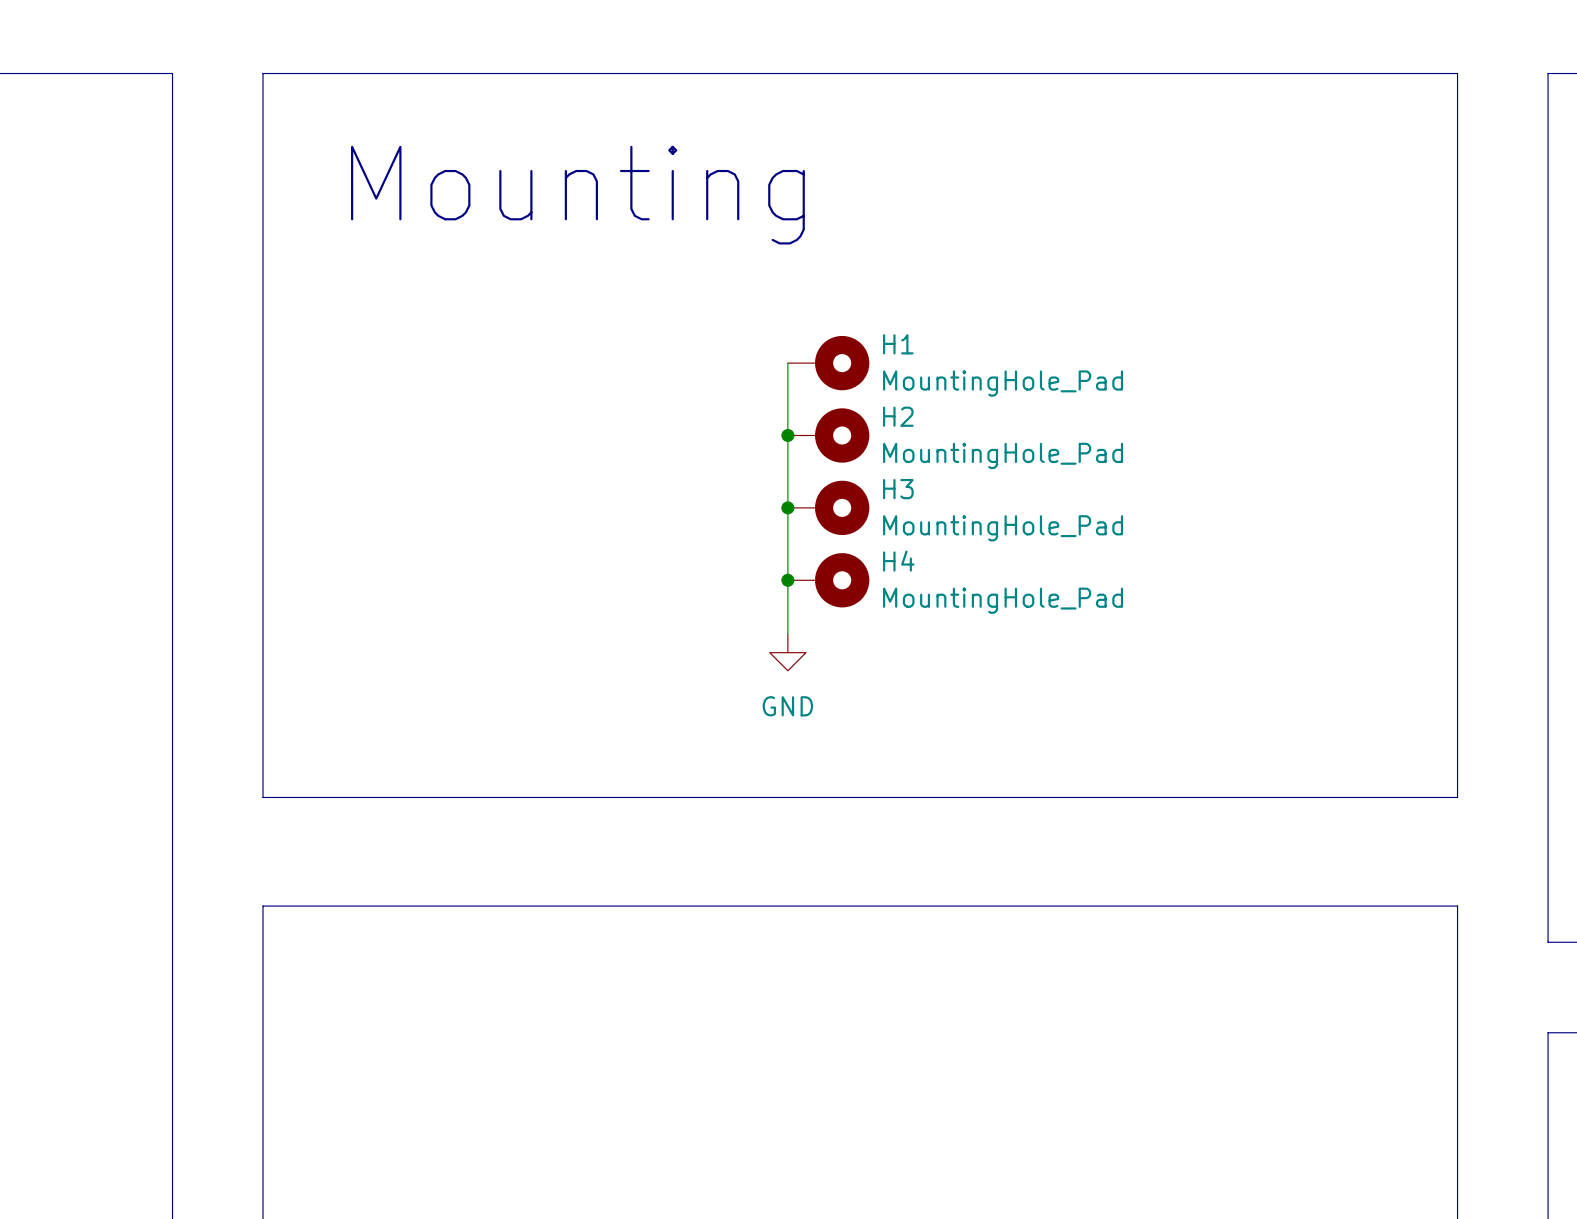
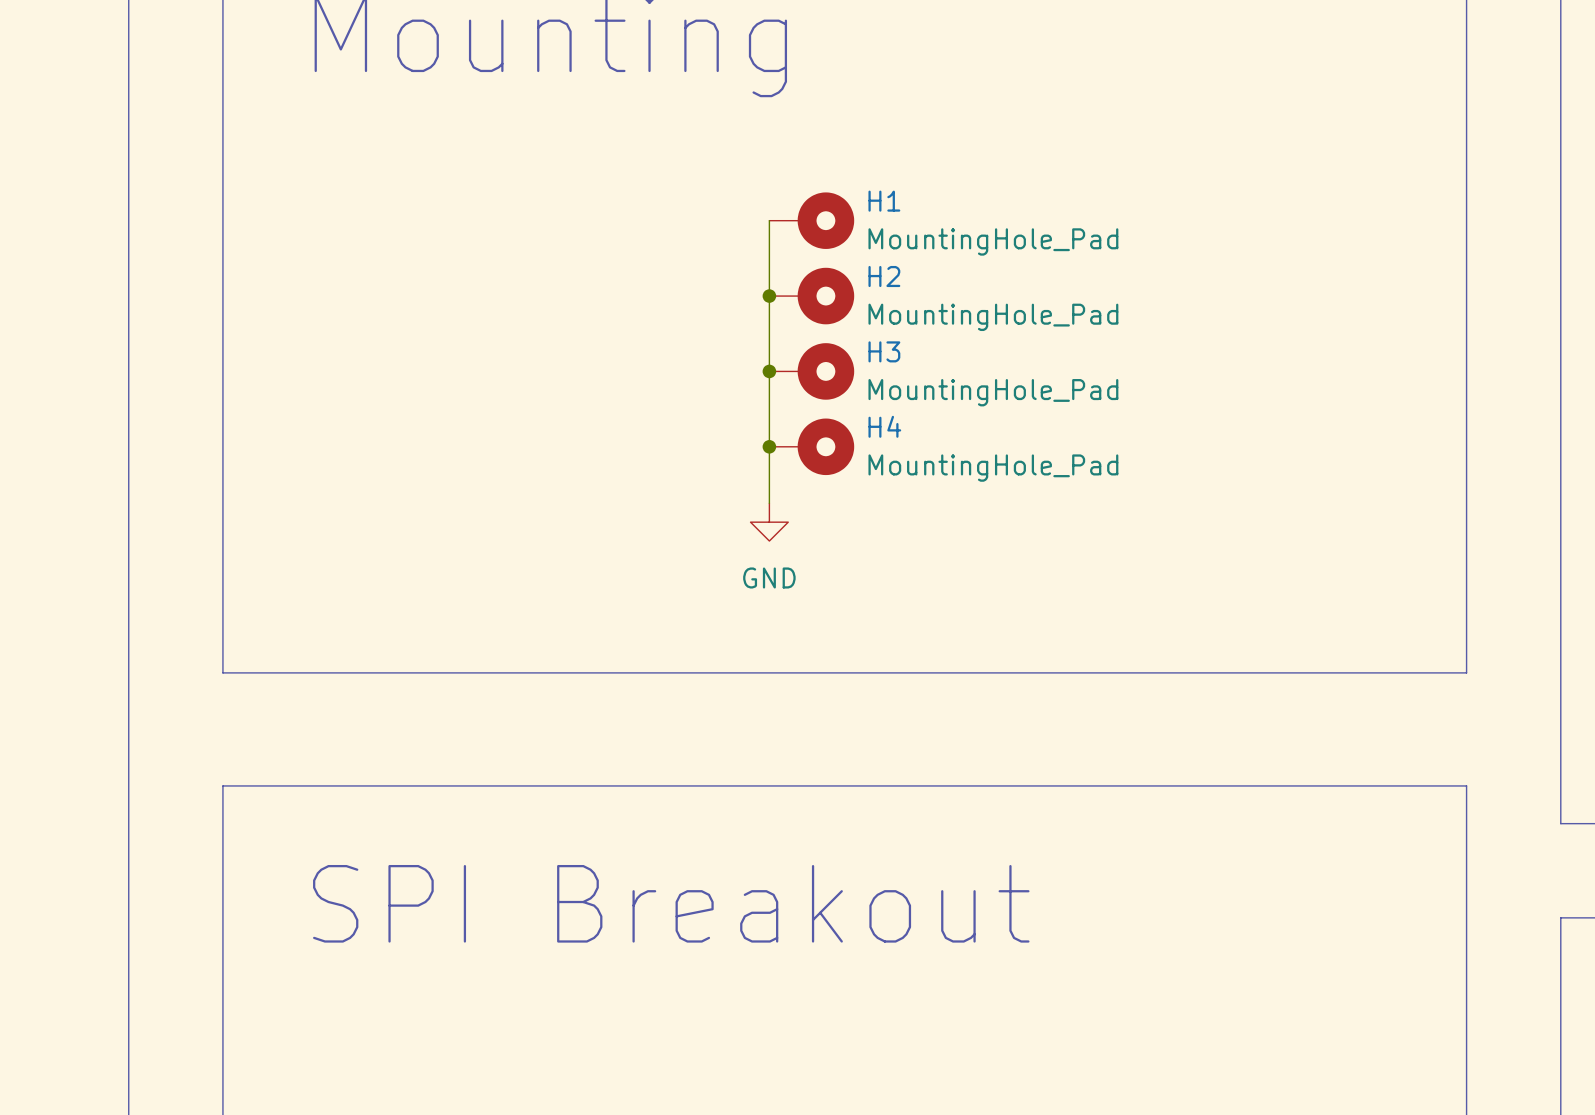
text: none -> SPI Breakout (671, 903)

